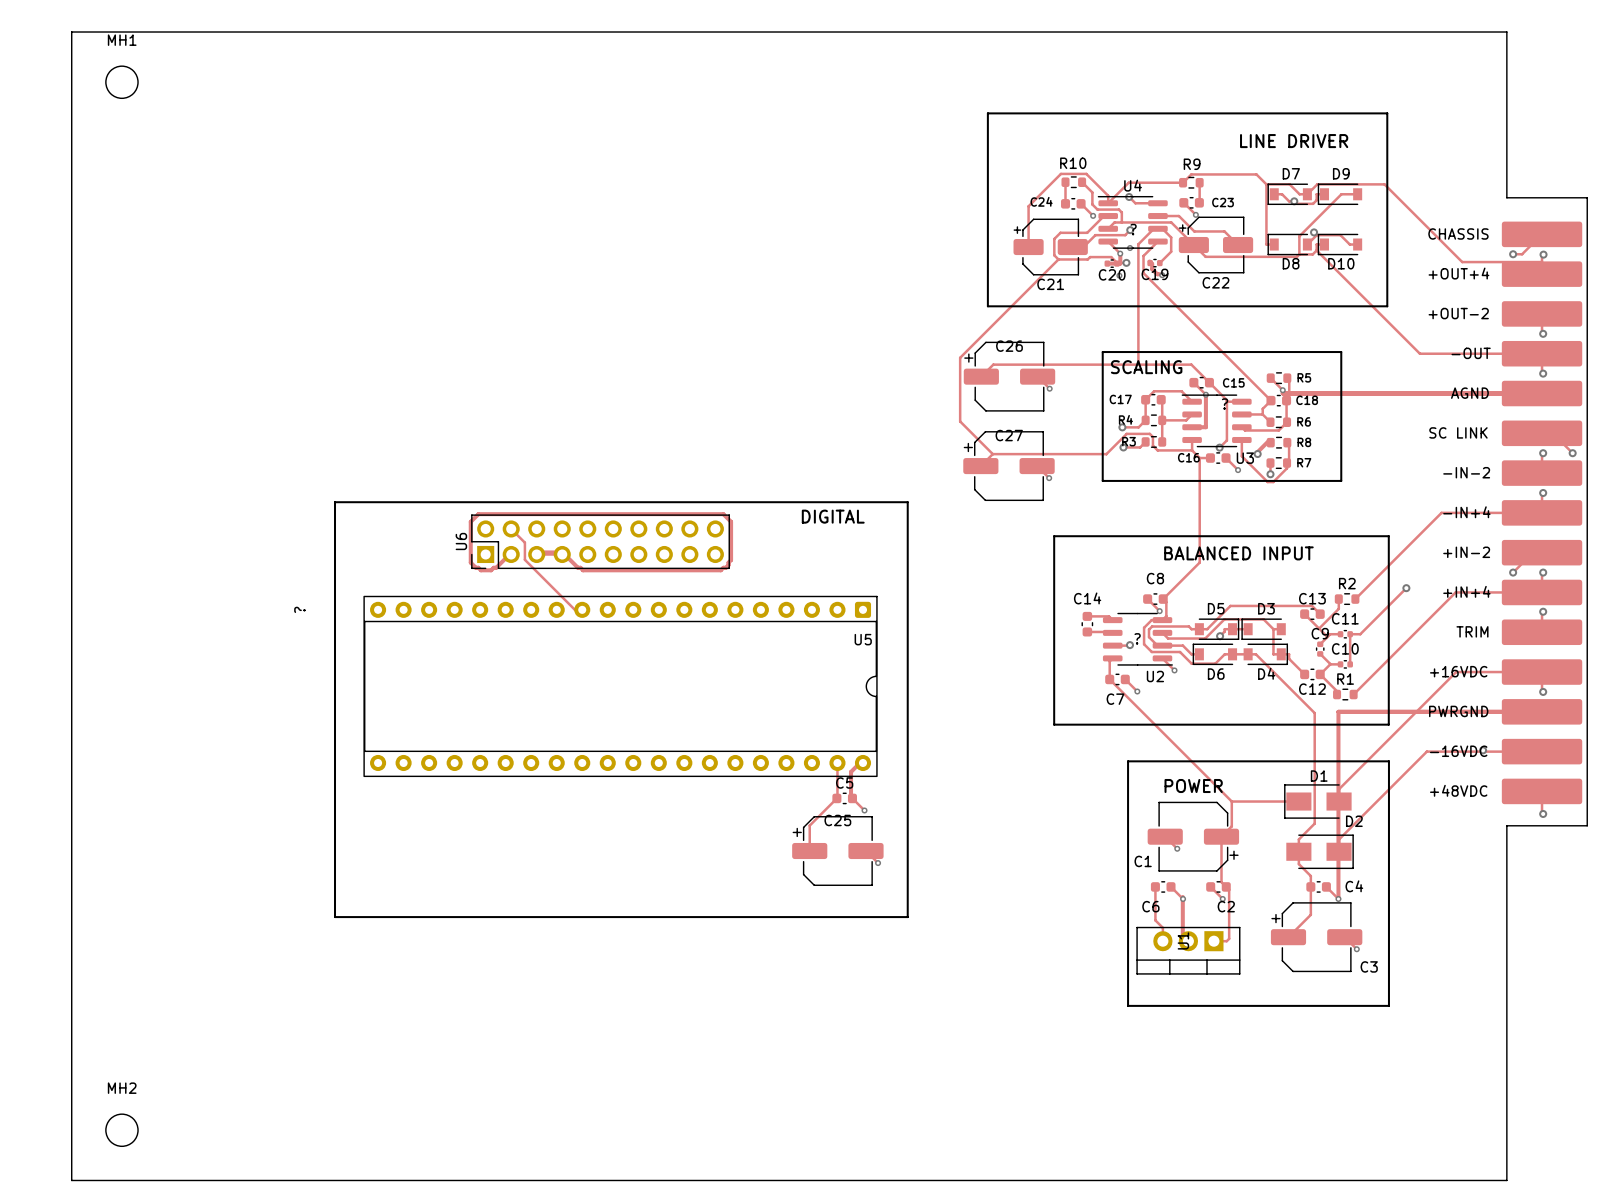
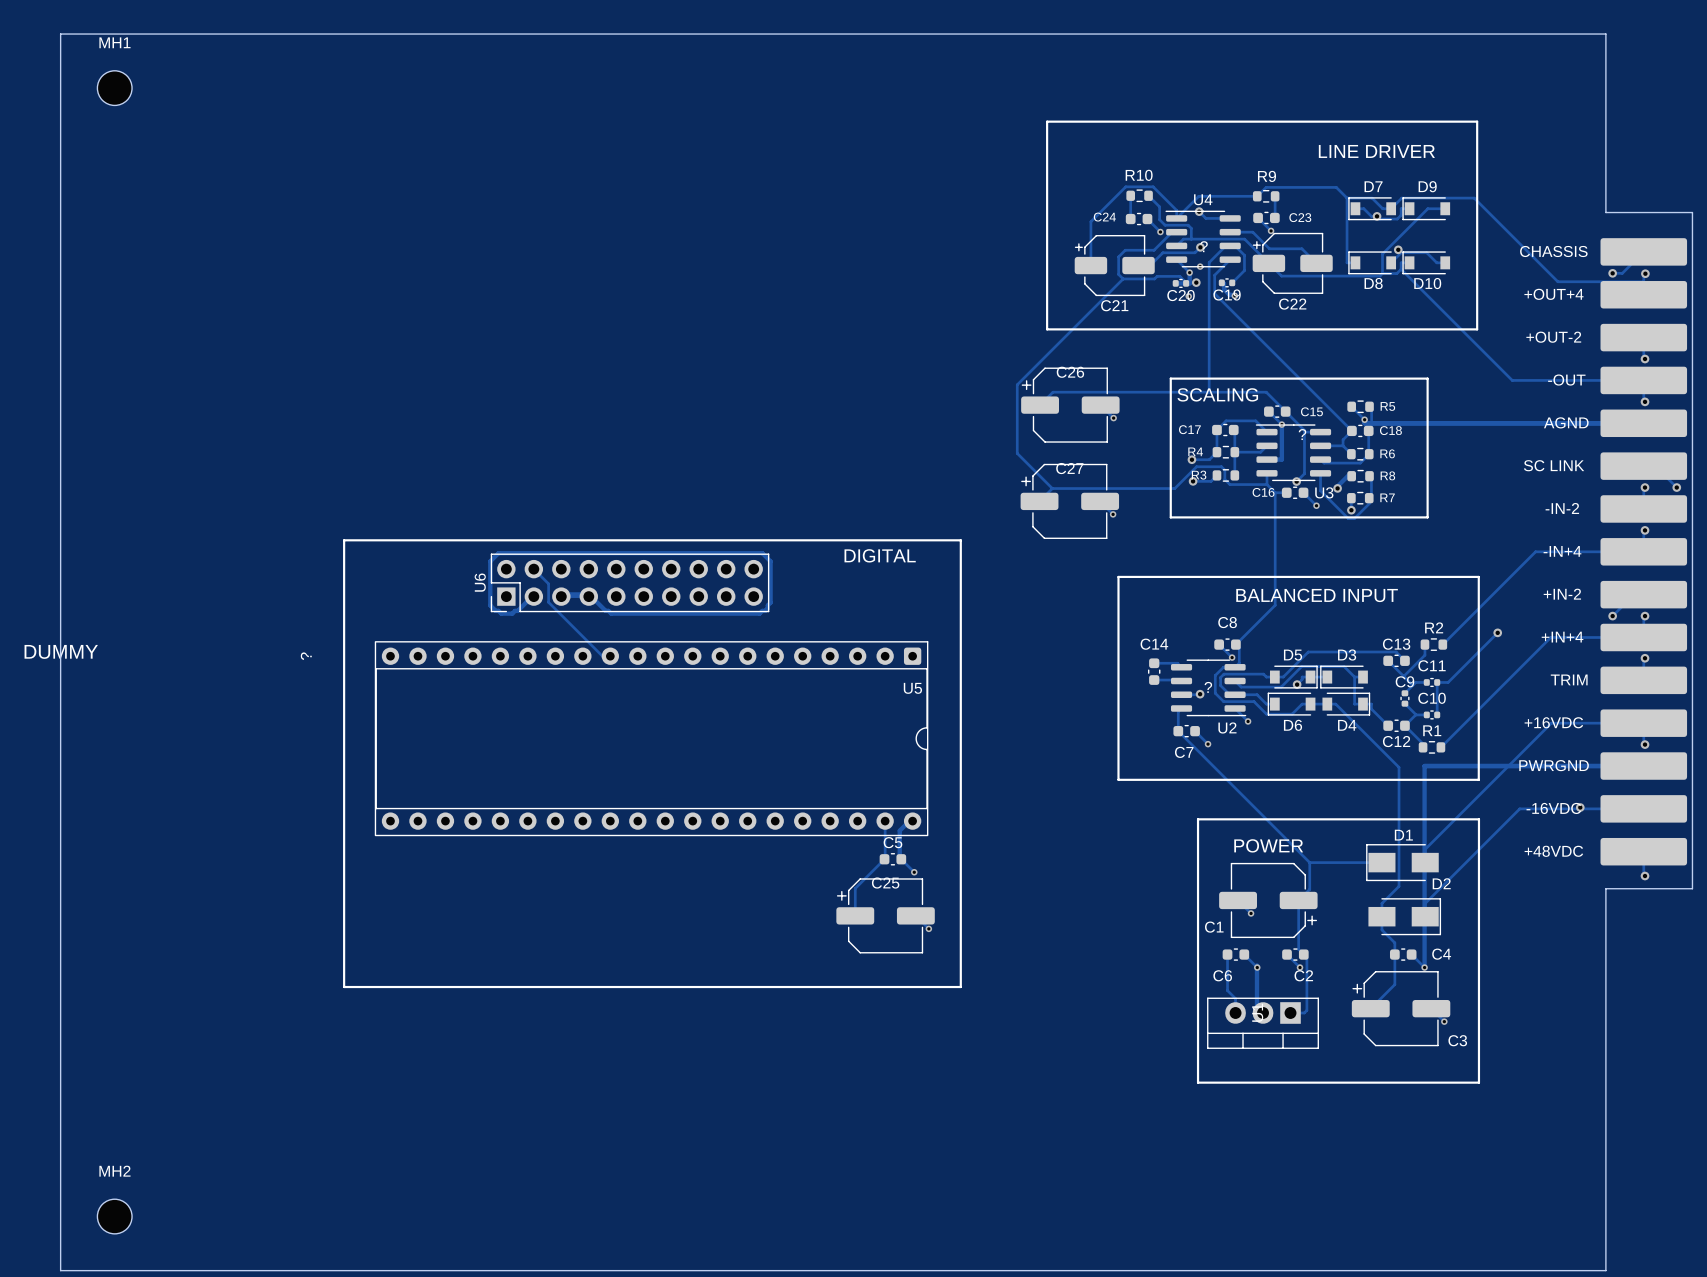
DUMMY: none -> (61, 651)

